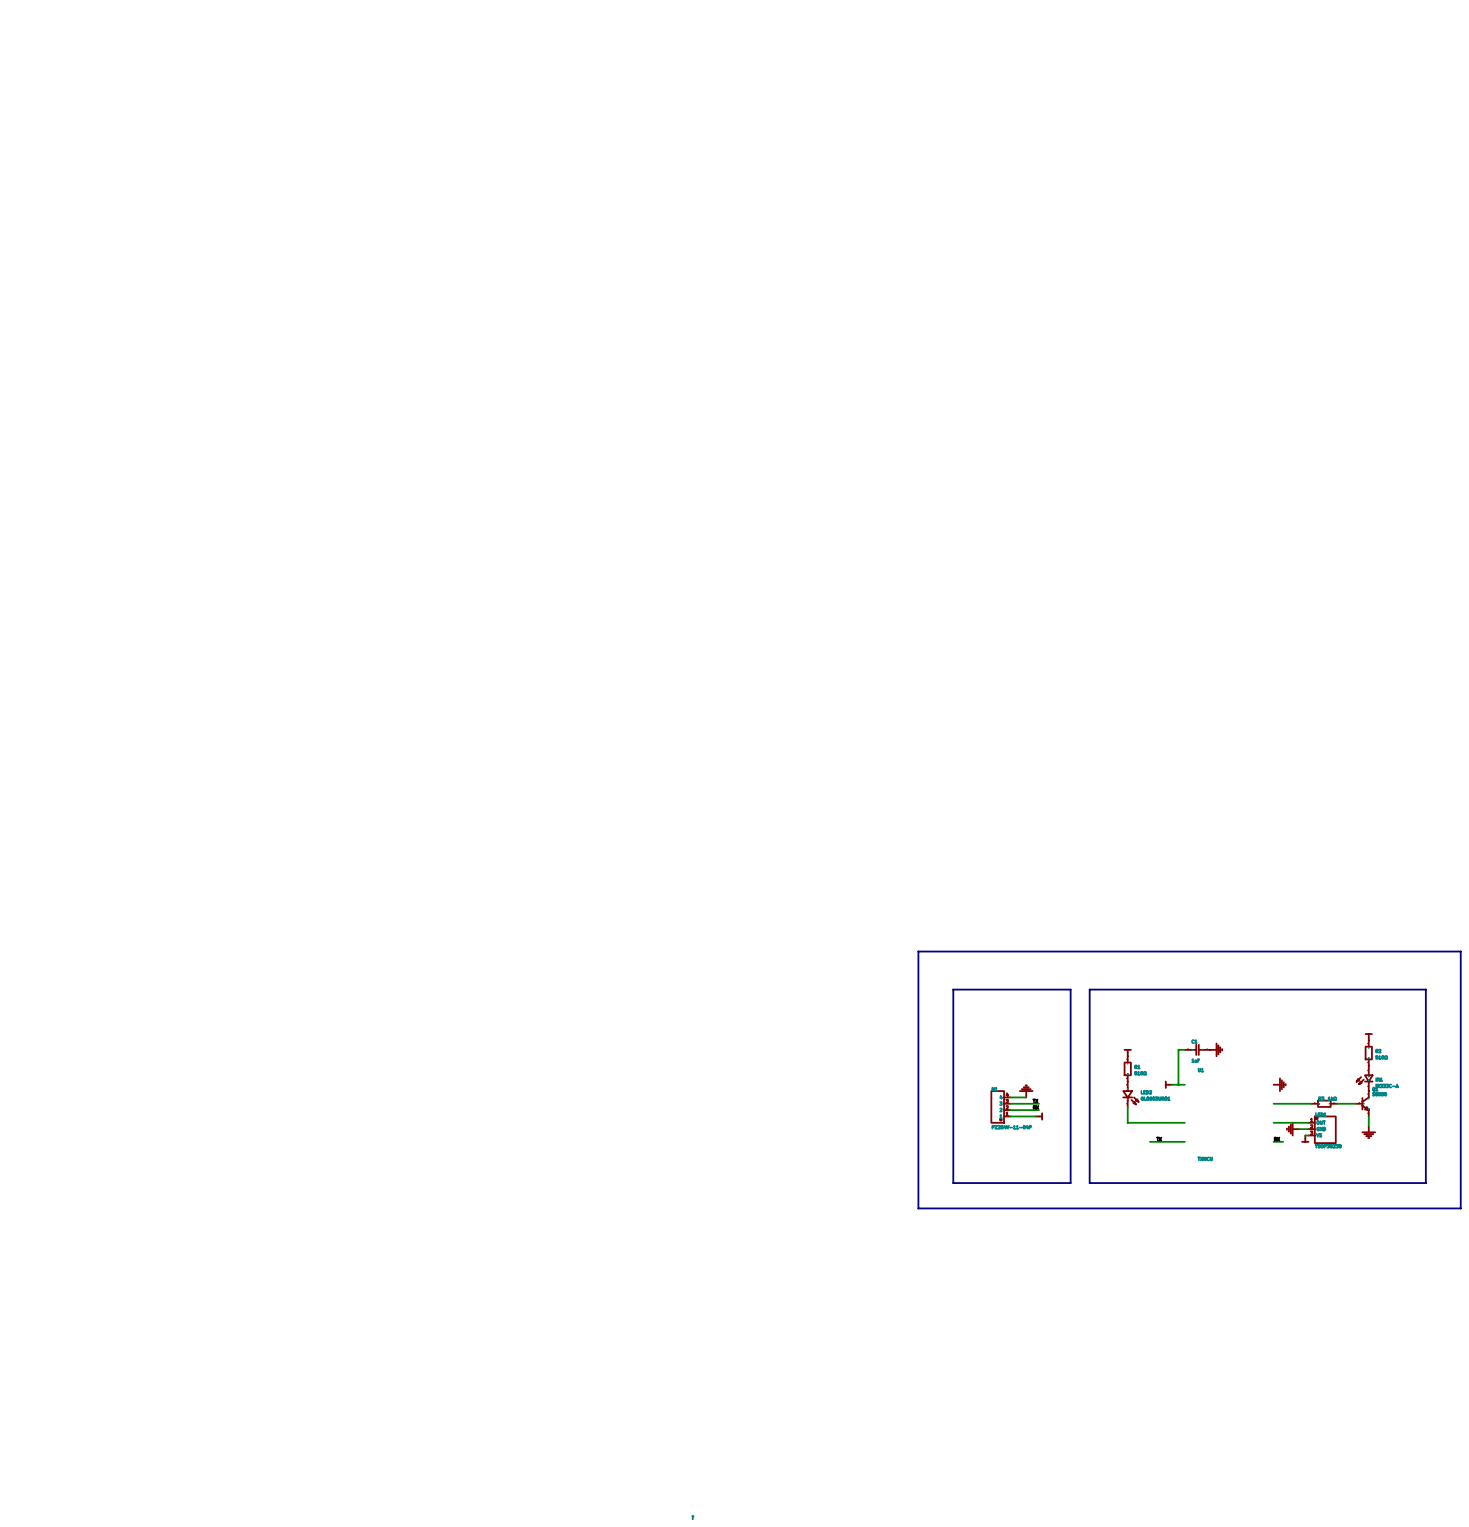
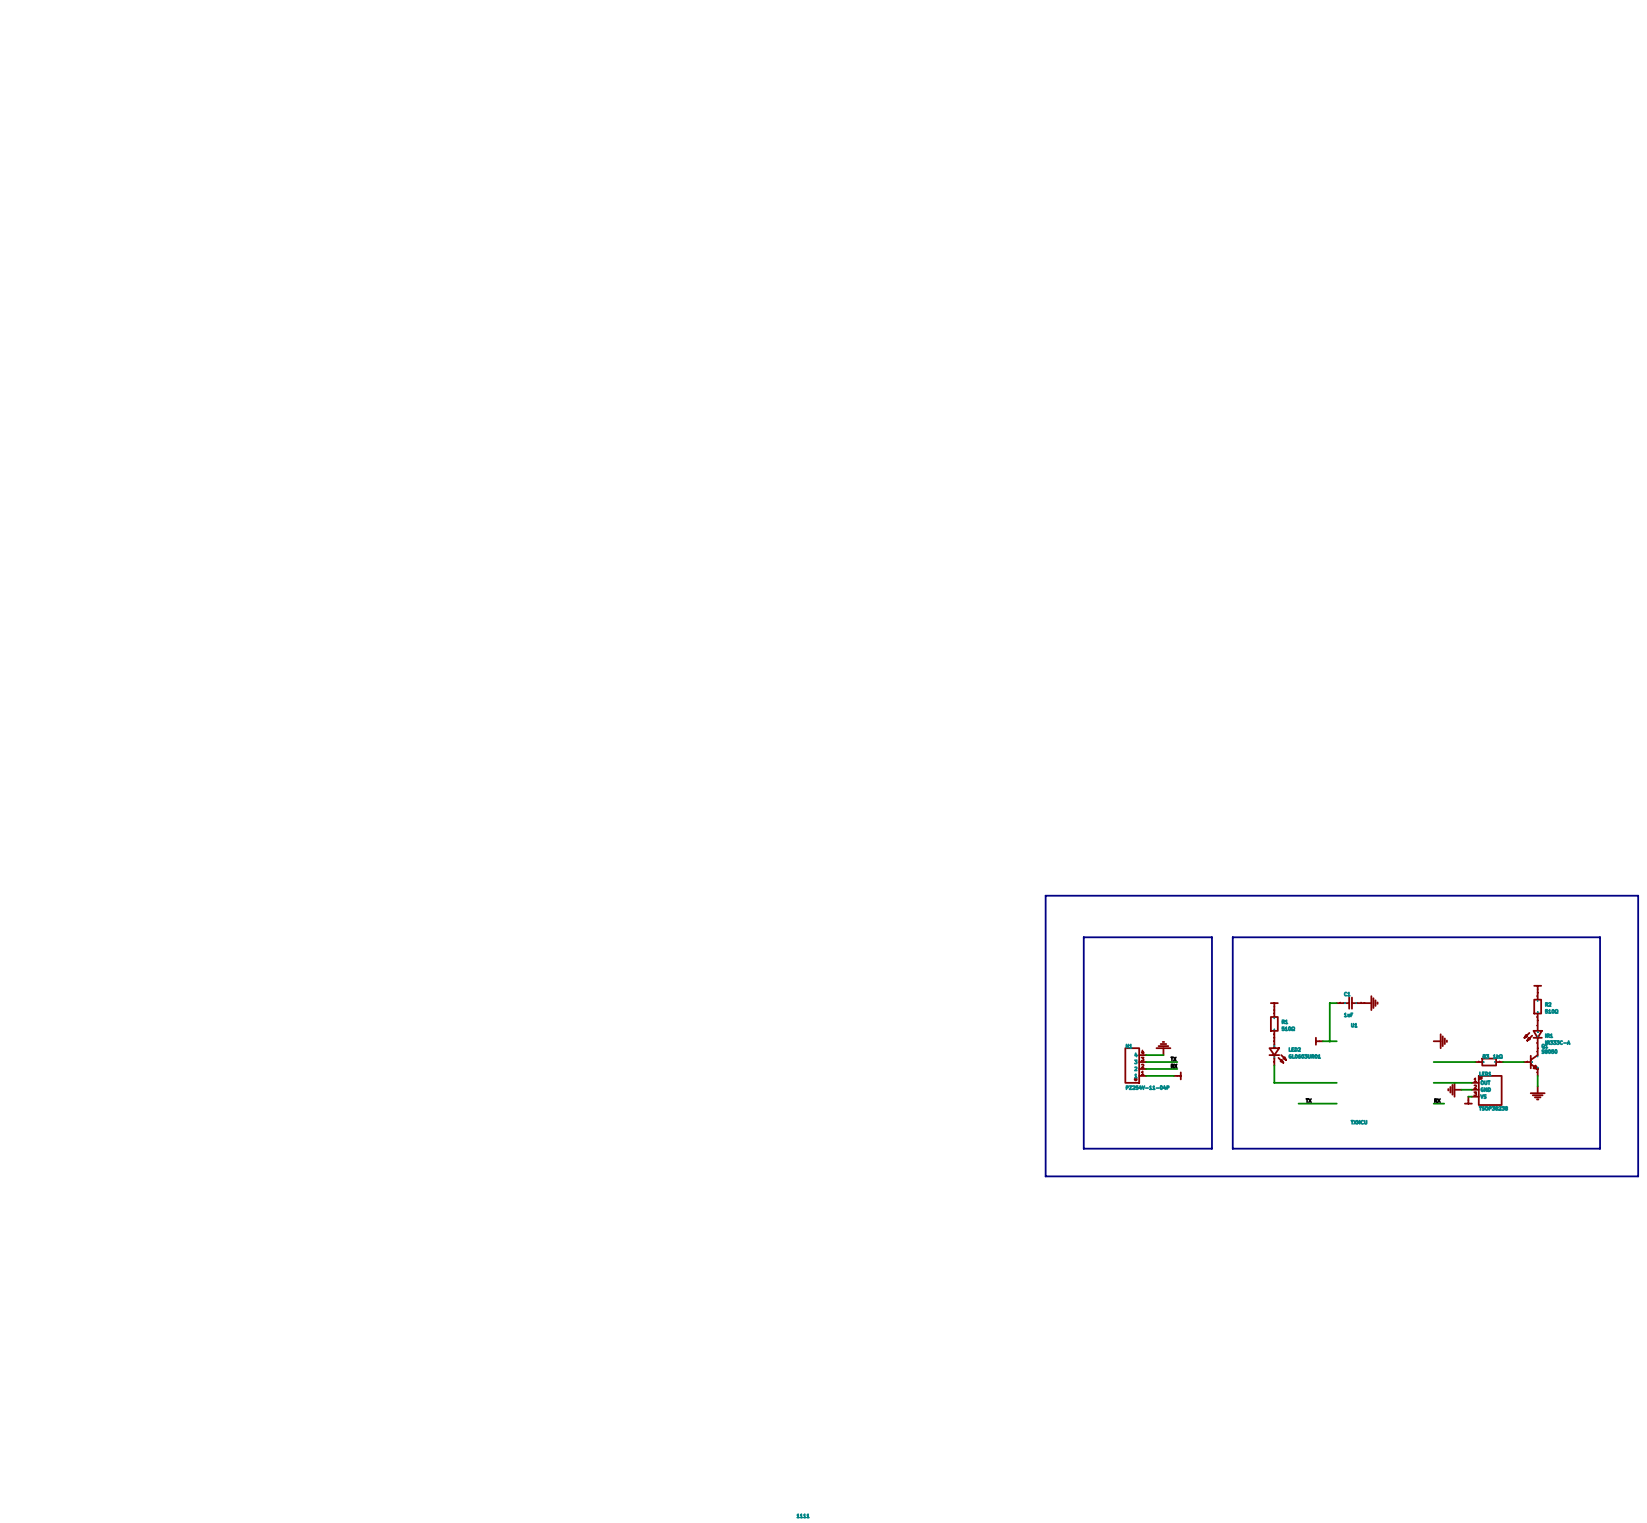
part: (692, 1517) -> none
part: none -> (803, 1515)

